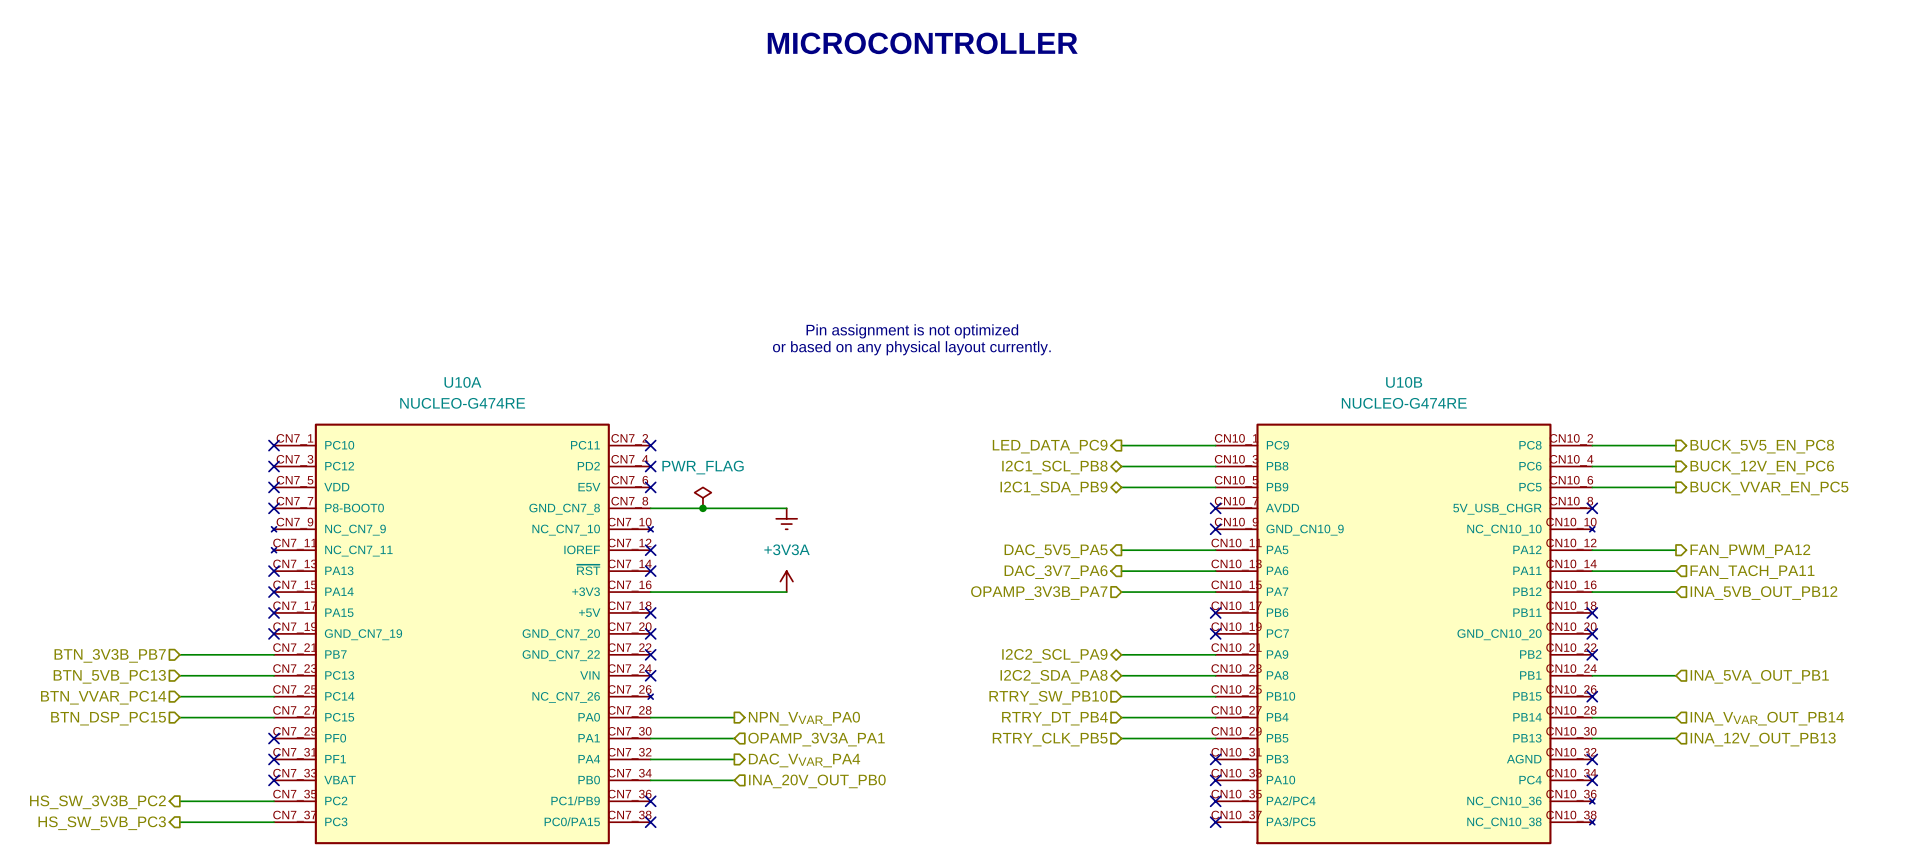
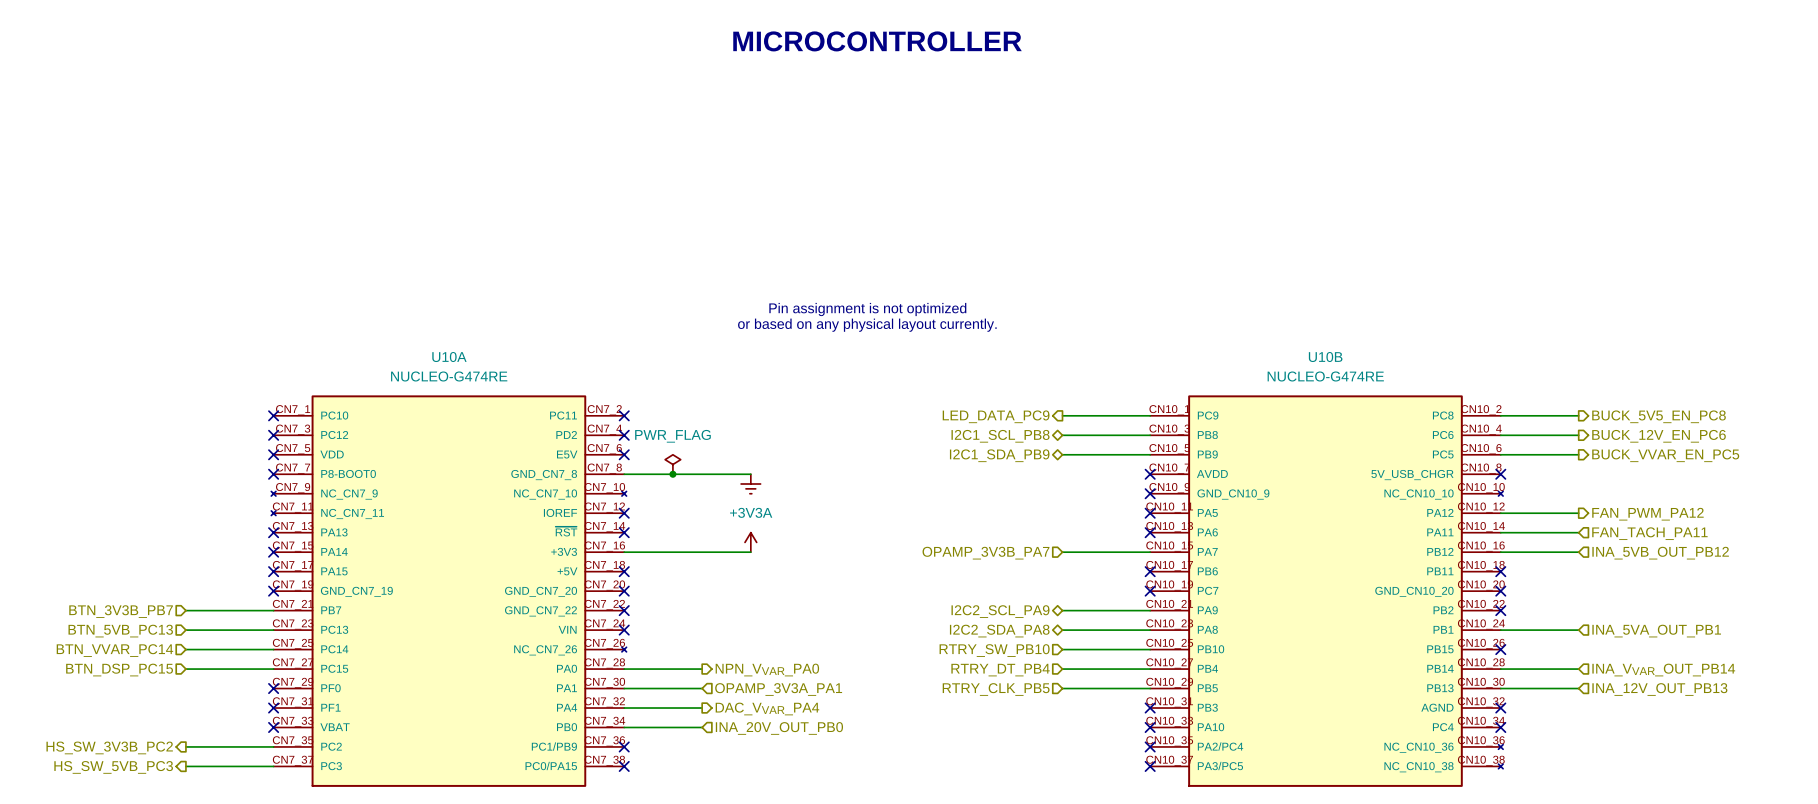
wire: (1121, 550) (1215, 550) -> none
no-connect mark: none -> (1150, 513)
hierarchical label: DAC_5V5_PA5 (1056, 551) -> none
wire: (1121, 571) (1215, 571) -> none
no-connect mark: none -> (1150, 532)
hierarchical label: DAC_3V7_PA6 (1056, 572) -> none

